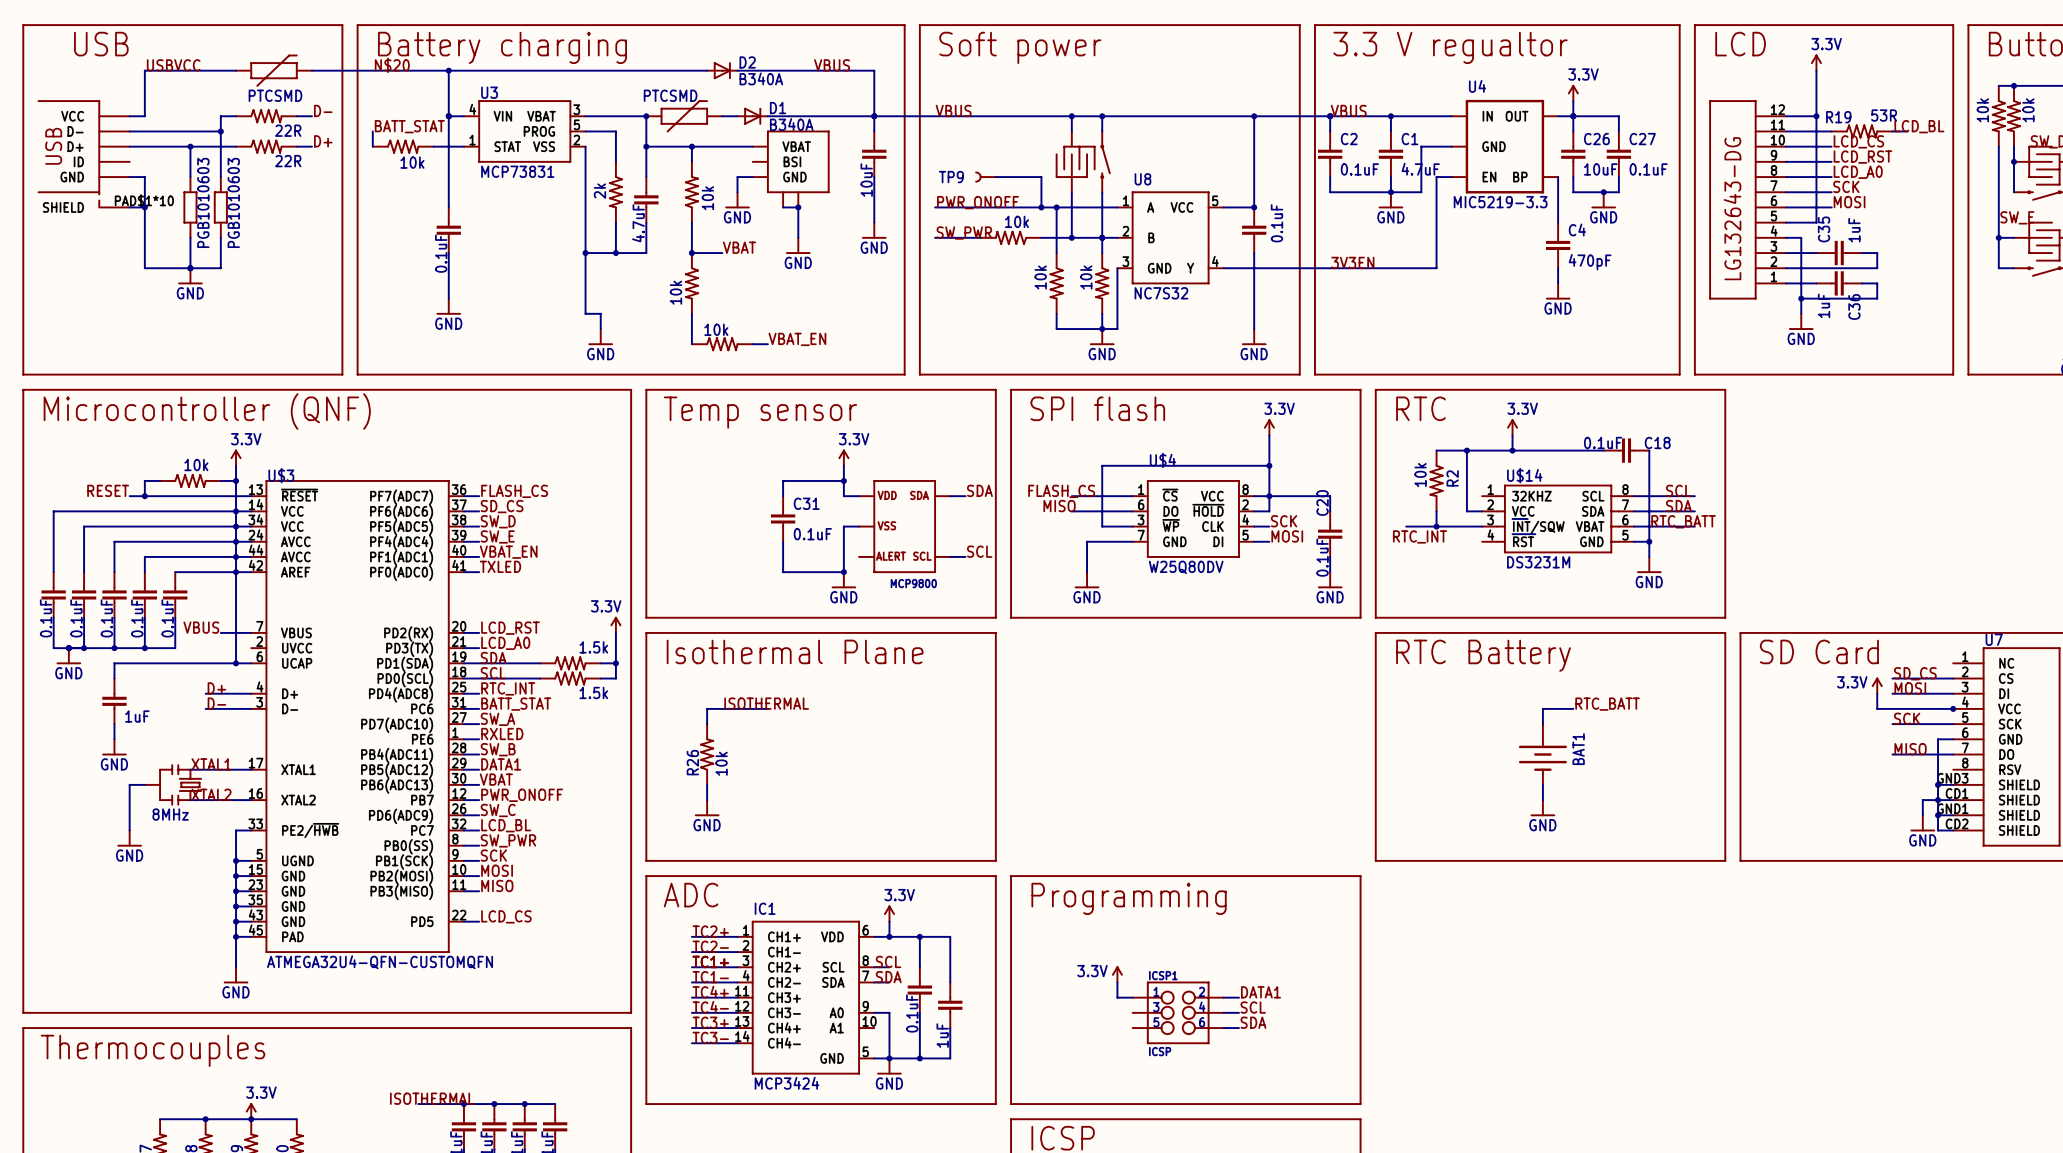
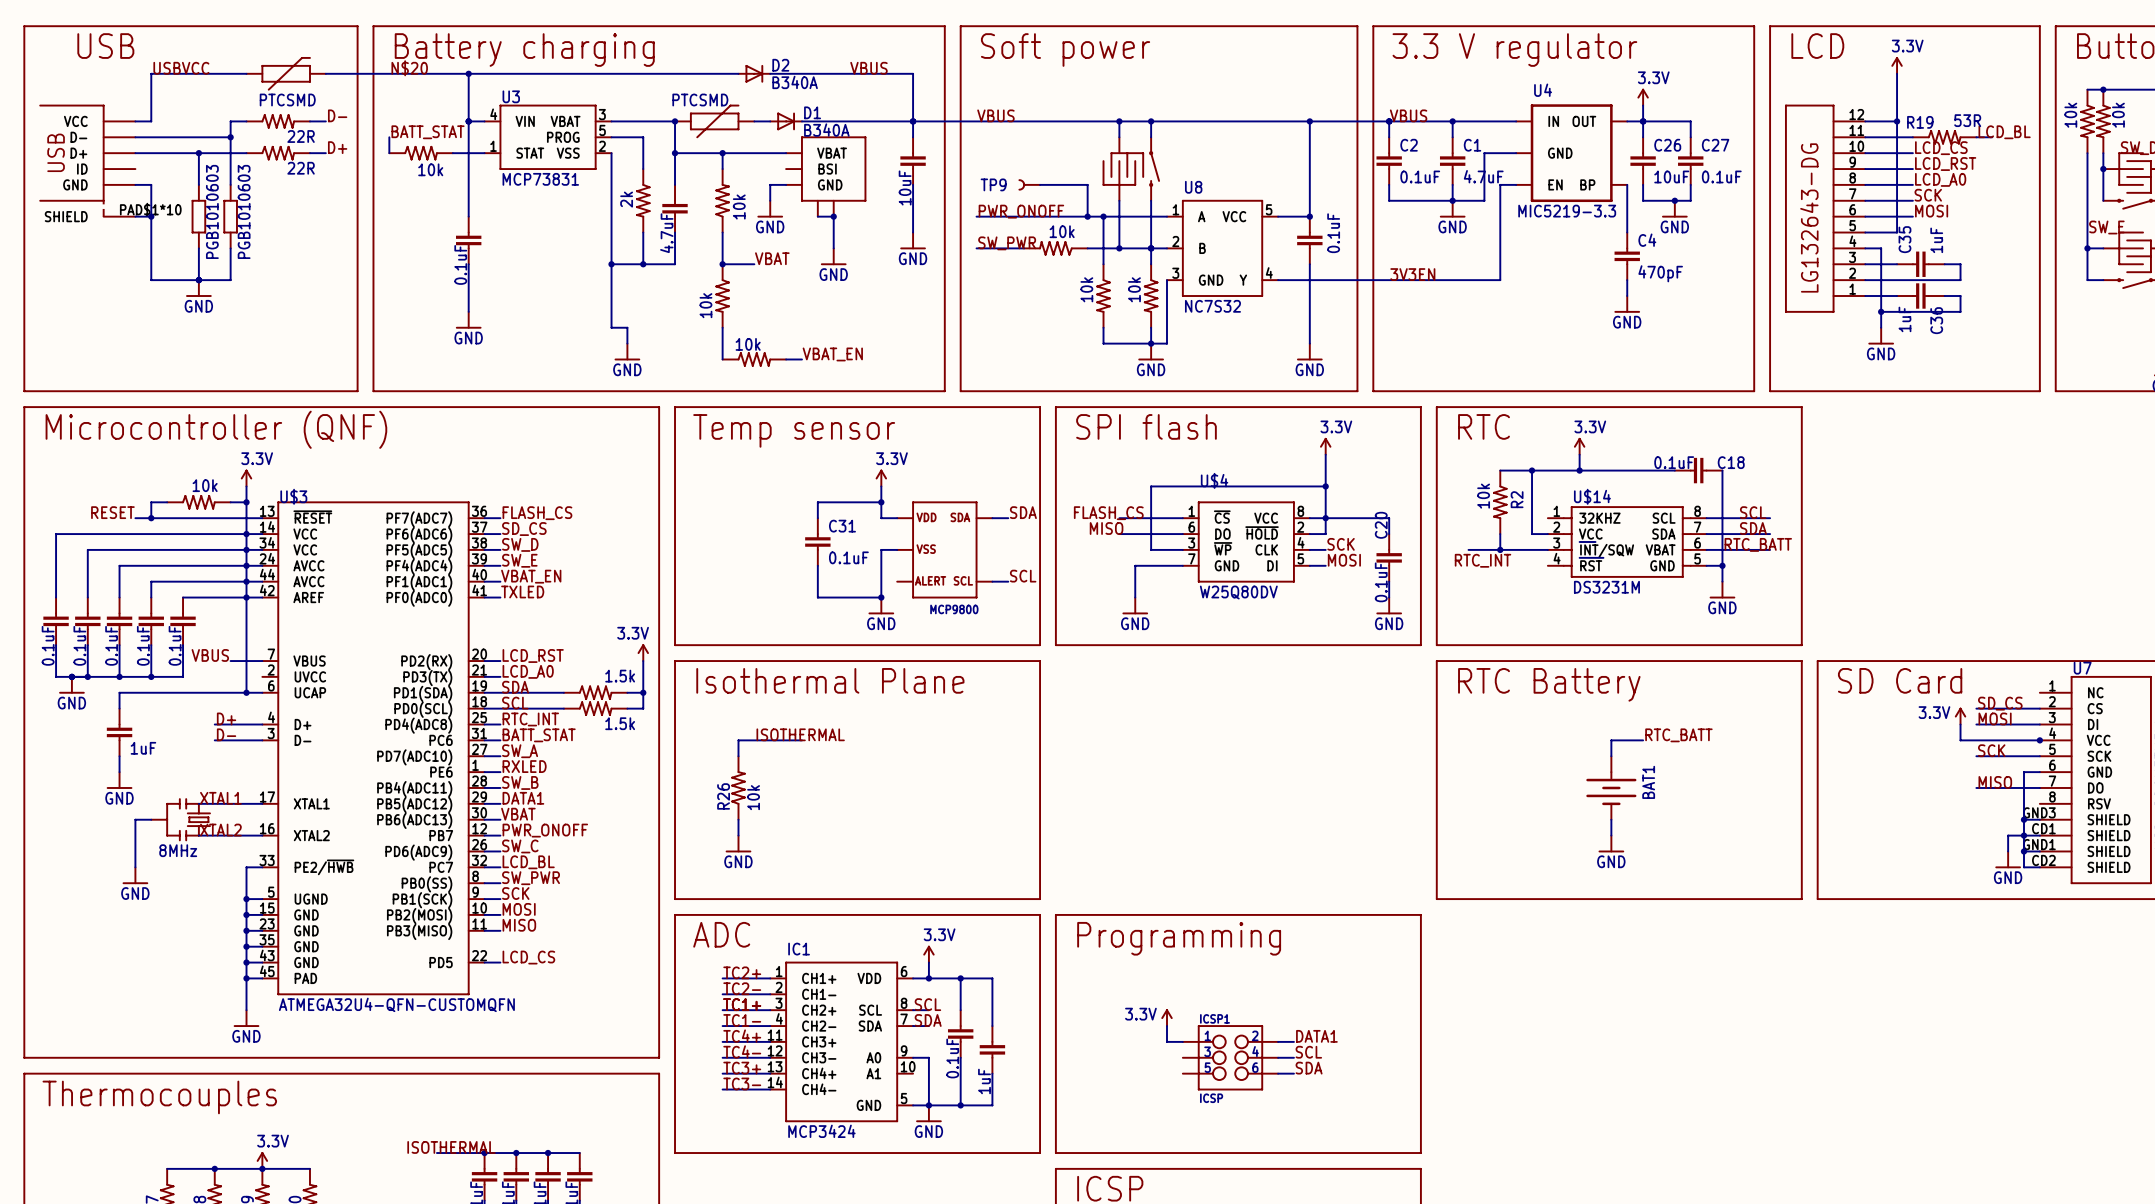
text: 3.3 V regualtor (1450, 47) -> 3.3 V regulator (1514, 50)

